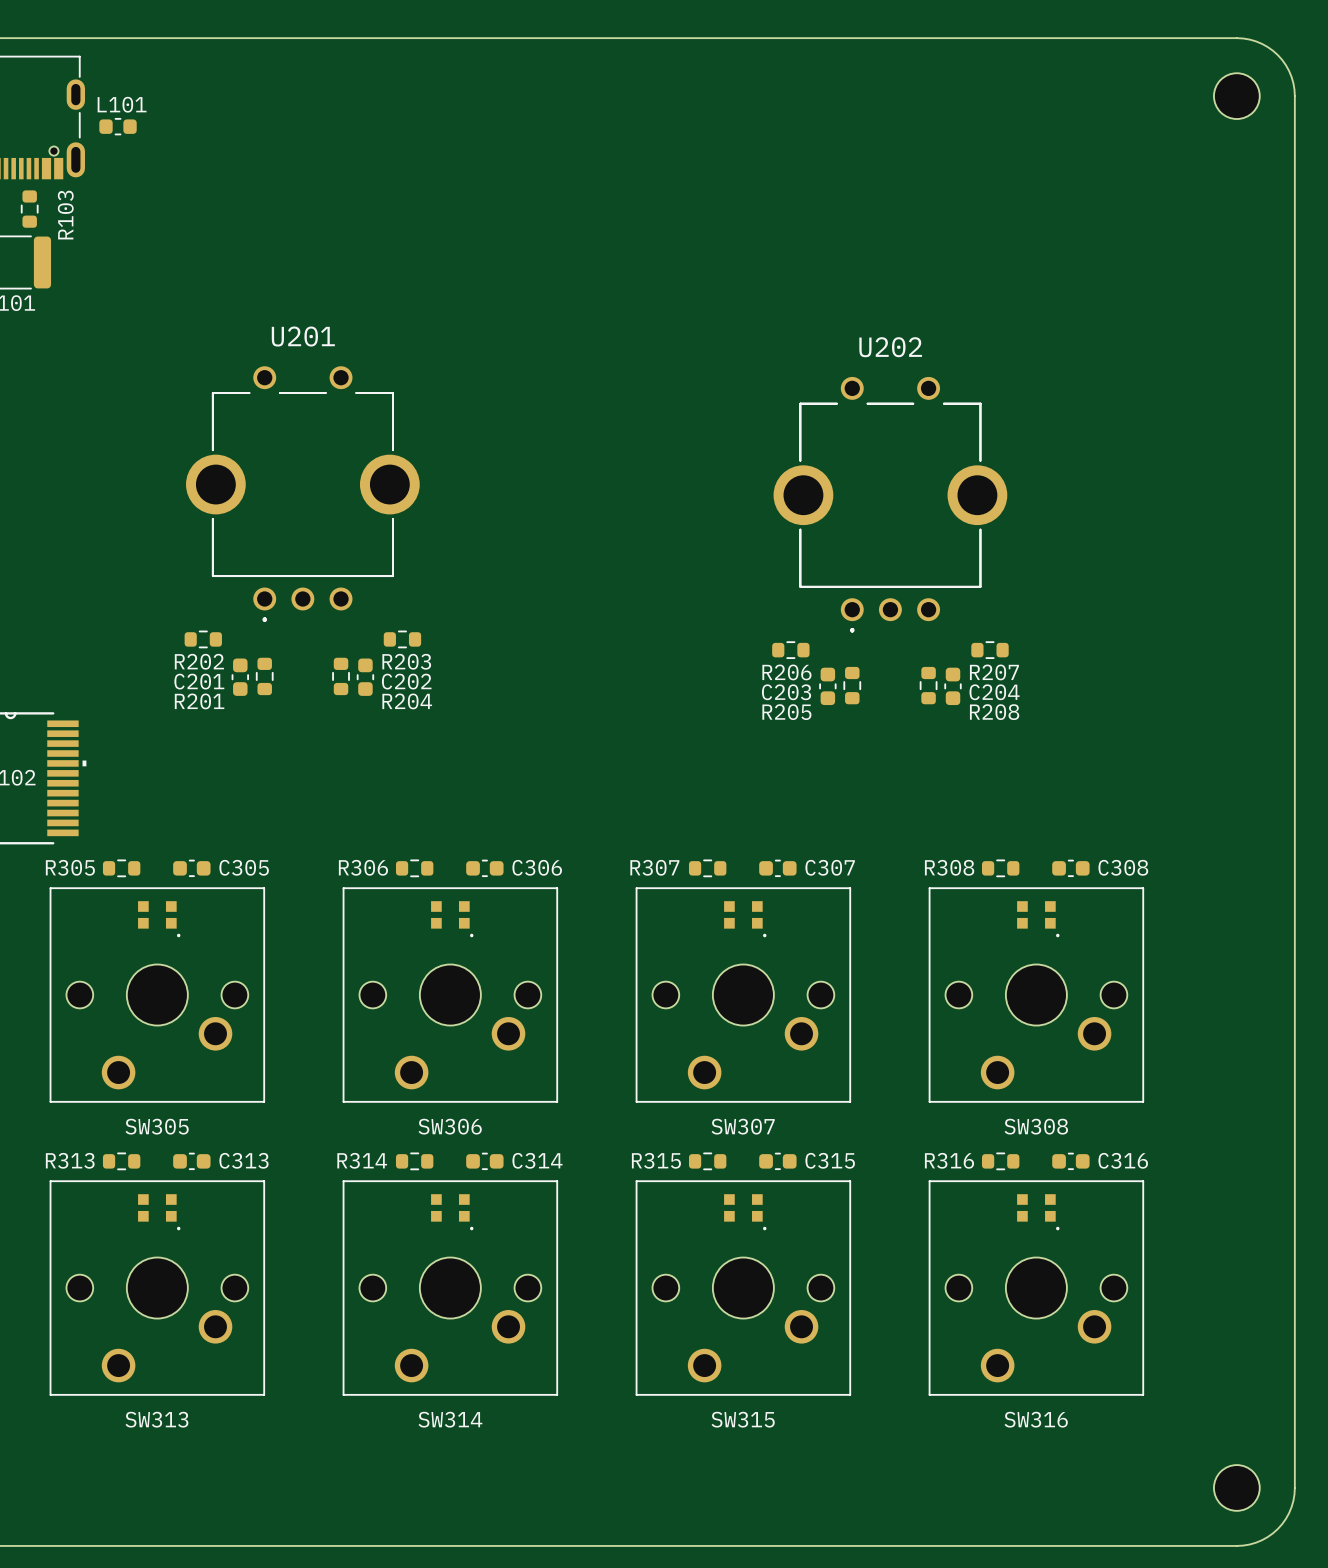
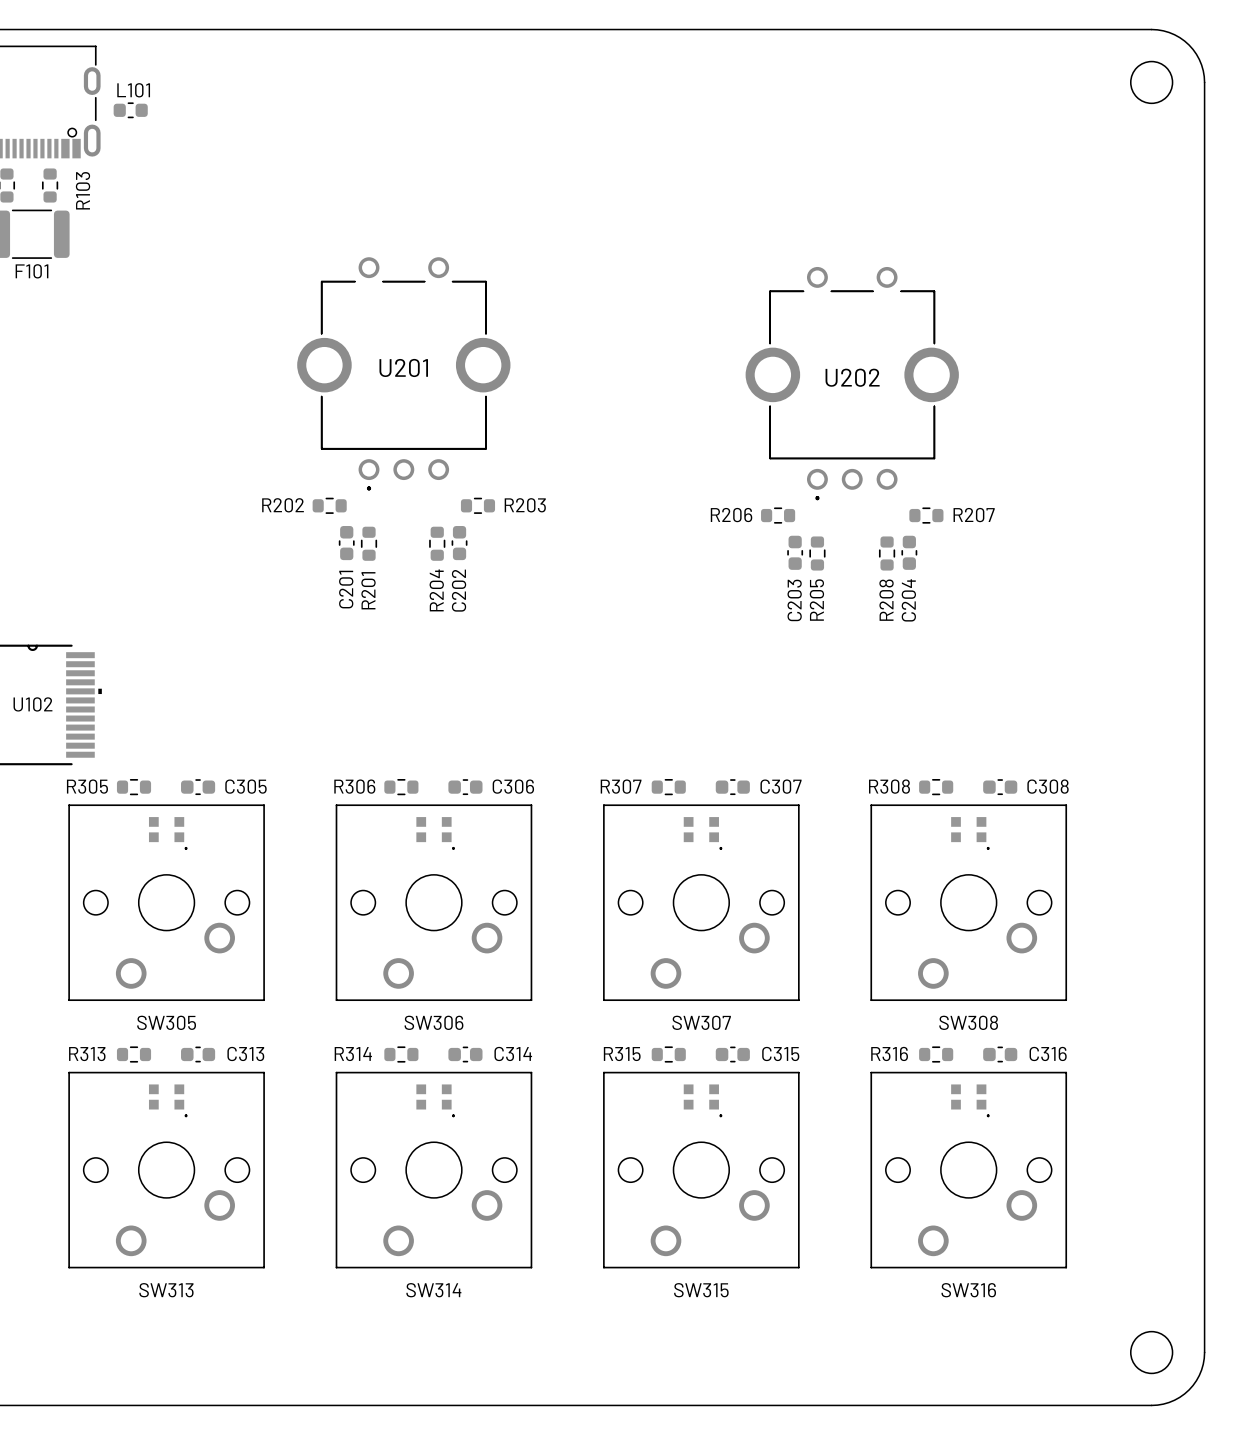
U201 name position: U201 (303, 336) -> U201 (403, 367)
U202 name position: U202 (890, 347) -> U202 (852, 377)
U201 position: (302, 494) -> (403, 373)
U202 position: (890, 504) -> (852, 383)
R202 position: (203, 639) -> (329, 505)
R203 position: (402, 639) -> (477, 505)
R206 position: (790, 650) -> (778, 515)
R207 position: (990, 650) -> (926, 515)
R202 name position: R202 (199, 661) -> R202 (283, 505)
R203 name position: R203 (406, 661) -> R203 (525, 505)
R206 name position: R206 (786, 672) -> R206 (731, 515)
R207 name position: R207 (994, 672) -> R207 (974, 515)
R201 position: (264, 676) -> (369, 543)
R204 position: (341, 676) -> (437, 543)
C201 position: (240, 677) -> (346, 543)
C202 position: (365, 677) -> (459, 543)
C201 name rotation: 0° (199, 681) -> 90° counterclockwise (346, 589)
C202 name rotation: 0° (406, 681) -> 90° counterclockwise (459, 590)
R205 position: (852, 685) -> (817, 553)
R208 position: (928, 685) -> (887, 553)
C203 position: (827, 686) -> (795, 552)
C204 position: (953, 686) -> (909, 552)
C203 name rotation: 0° (786, 692) -> 90° counterclockwise (794, 600)
C204 name rotation: 0° (994, 692) -> 90° counterclockwise (908, 600)
R201 name rotation: 0° (199, 701) -> 90° counterclockwise (368, 590)
R201 name position: R201 (199, 701) -> R201 (368, 590)
R204 name rotation: 0° (407, 701) -> 90° counterclockwise (436, 590)
R205 name rotation: 0° (786, 712) -> 90° counterclockwise (816, 600)
R205 name position: R205 (786, 712) -> R205 (816, 600)
R208 name rotation: 0° (994, 712) -> 90° counterclockwise (886, 600)

